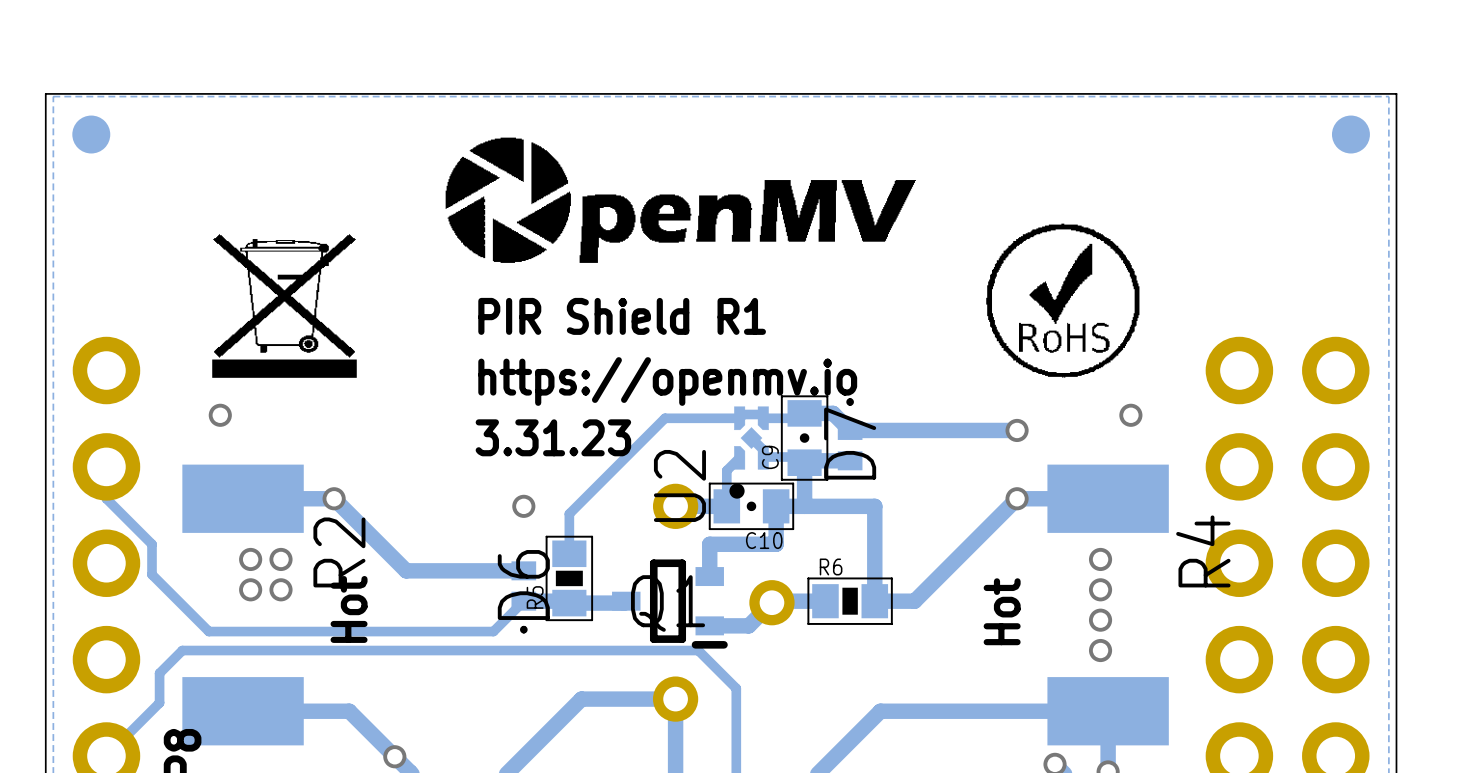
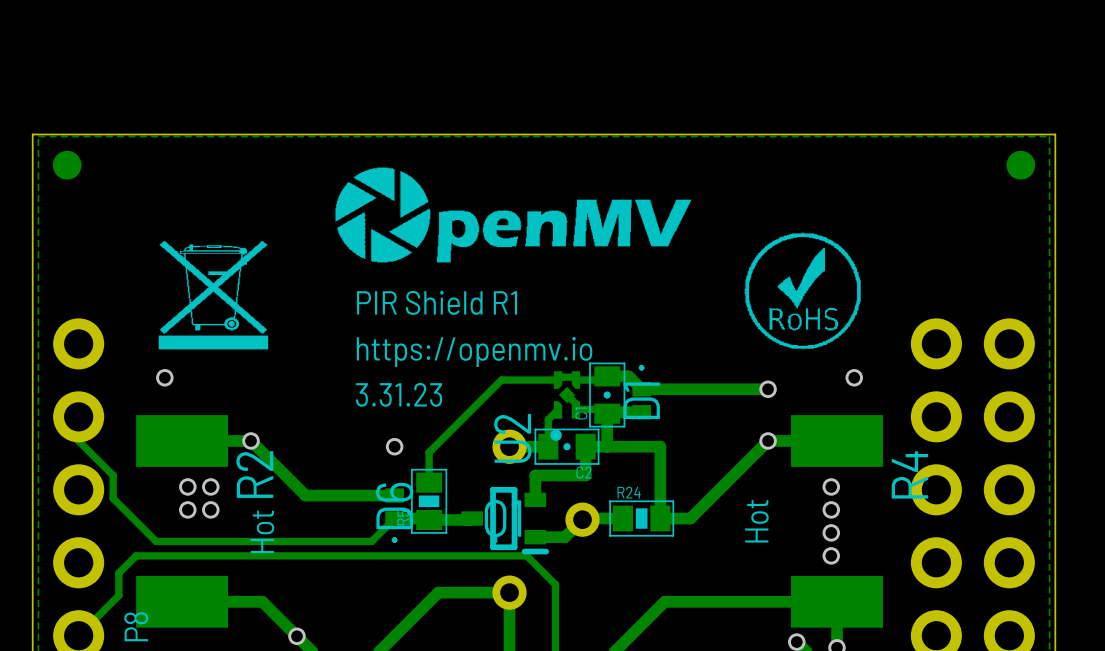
D7 name: D7 (850, 443) -> D1 (641, 400)
C9 name: C9 (770, 457) -> C1 (581, 413)
C10 name: C10 (764, 540) -> C2 (584, 472)
R6 name: R6 (831, 566) -> R24 (629, 492)

